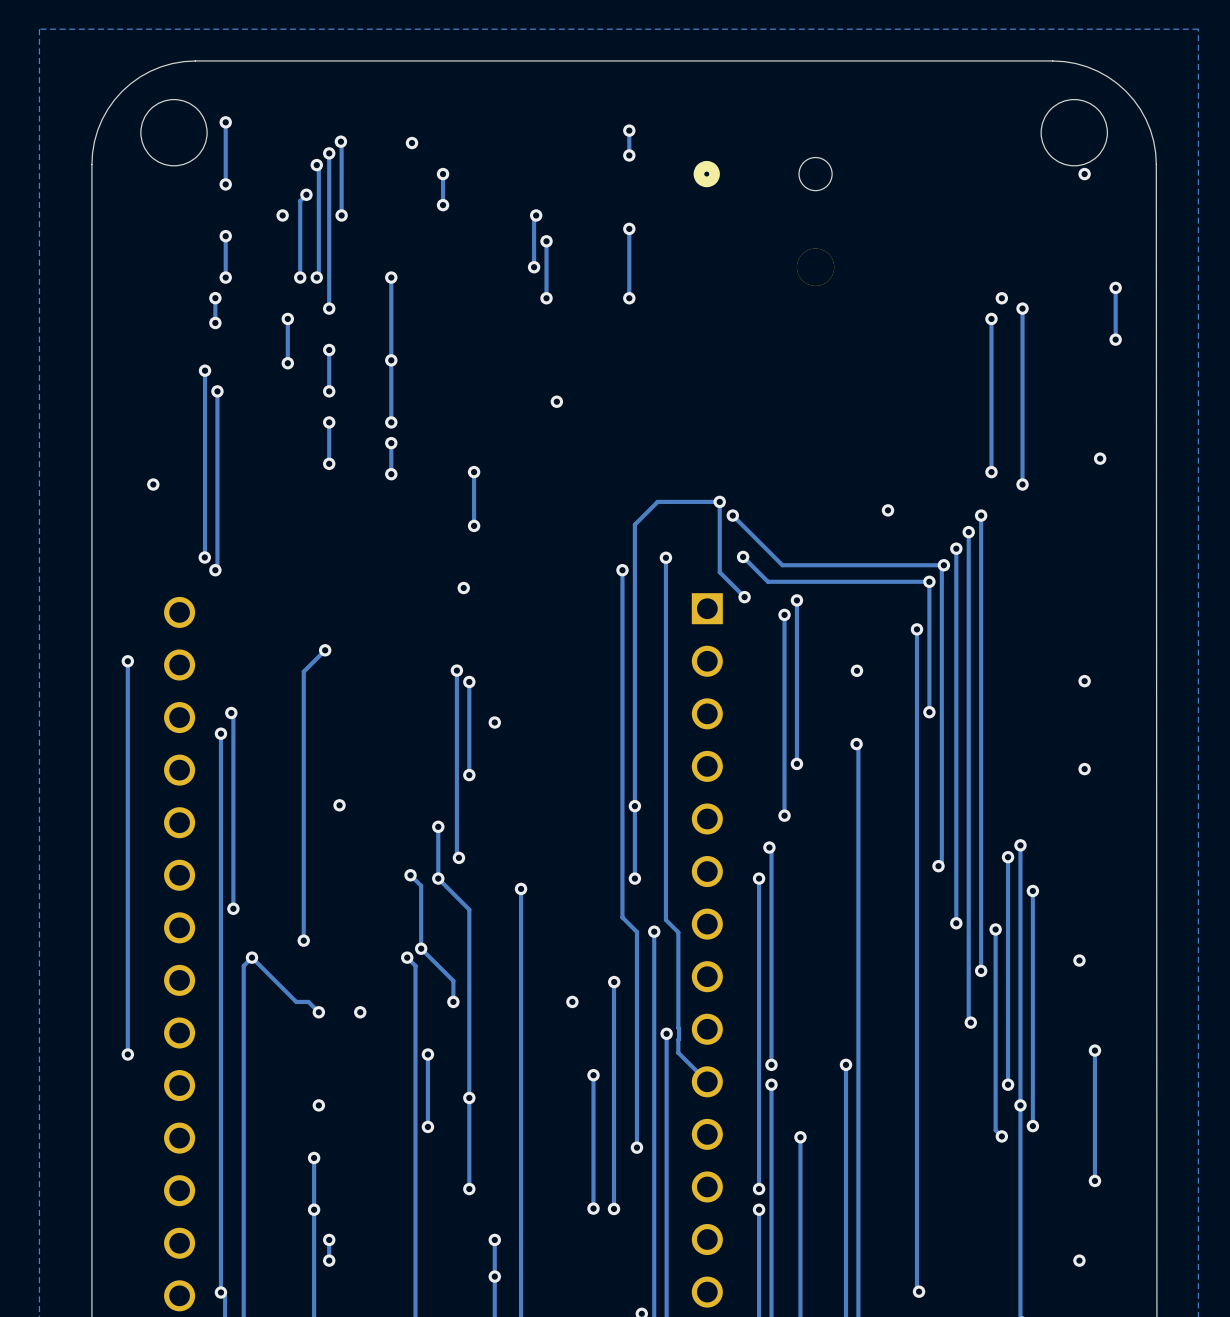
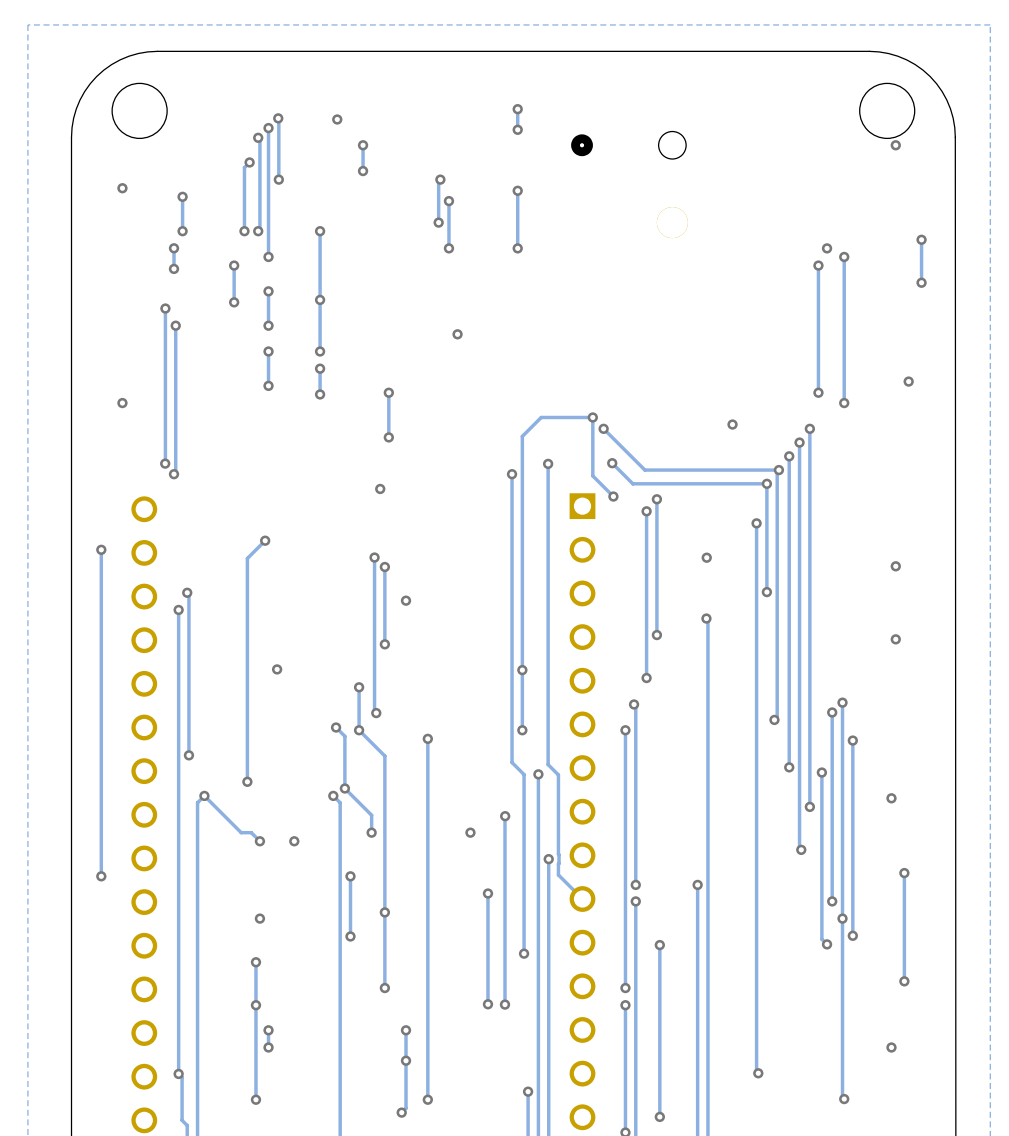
track: (225, 122) (225, 184) -> none
via: (225, 122) -> none
via: (225, 184) -> none
via: (282, 215) -> none
via: none -> (122, 188)

